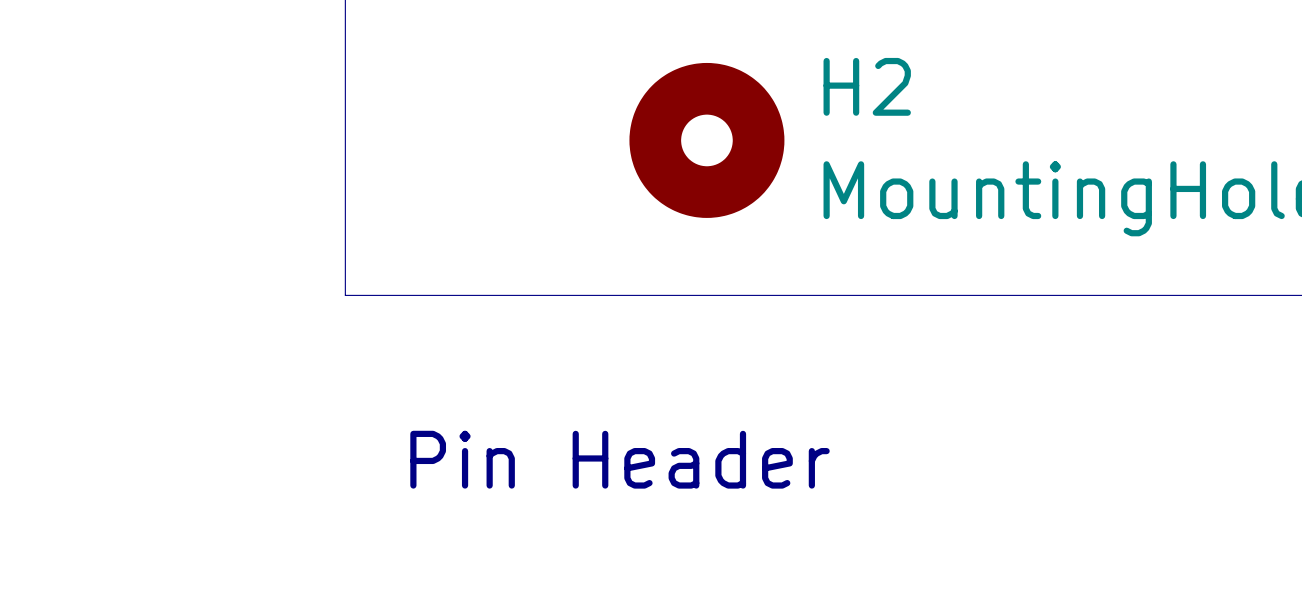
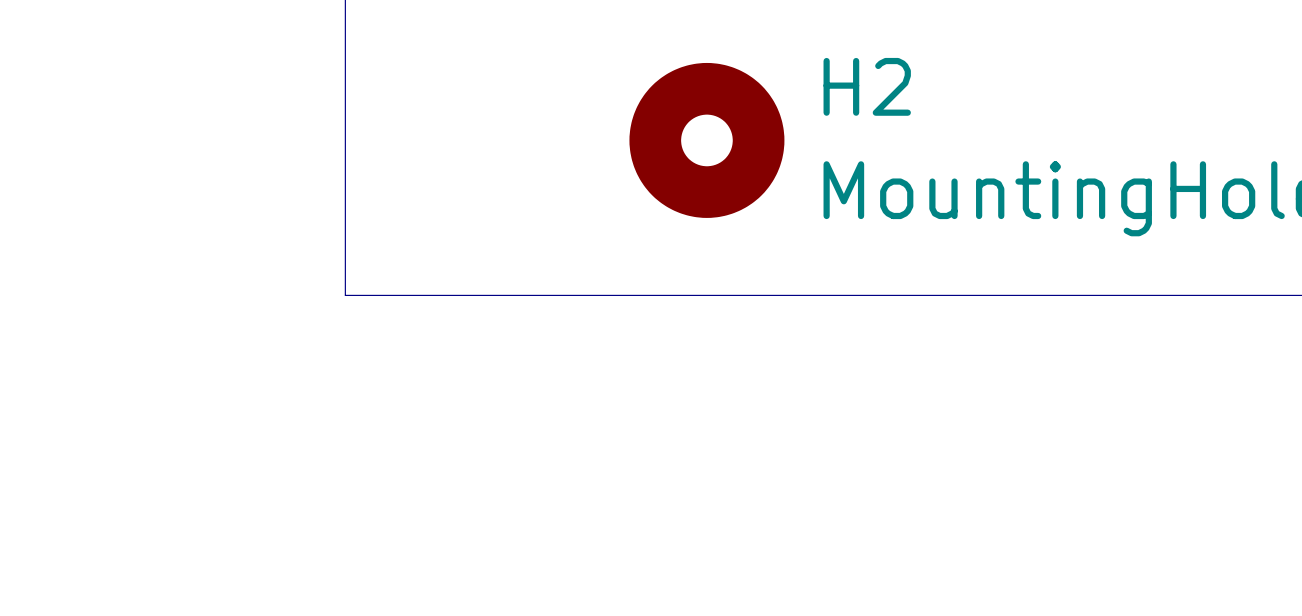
text: Pin Header (620, 459) -> none

